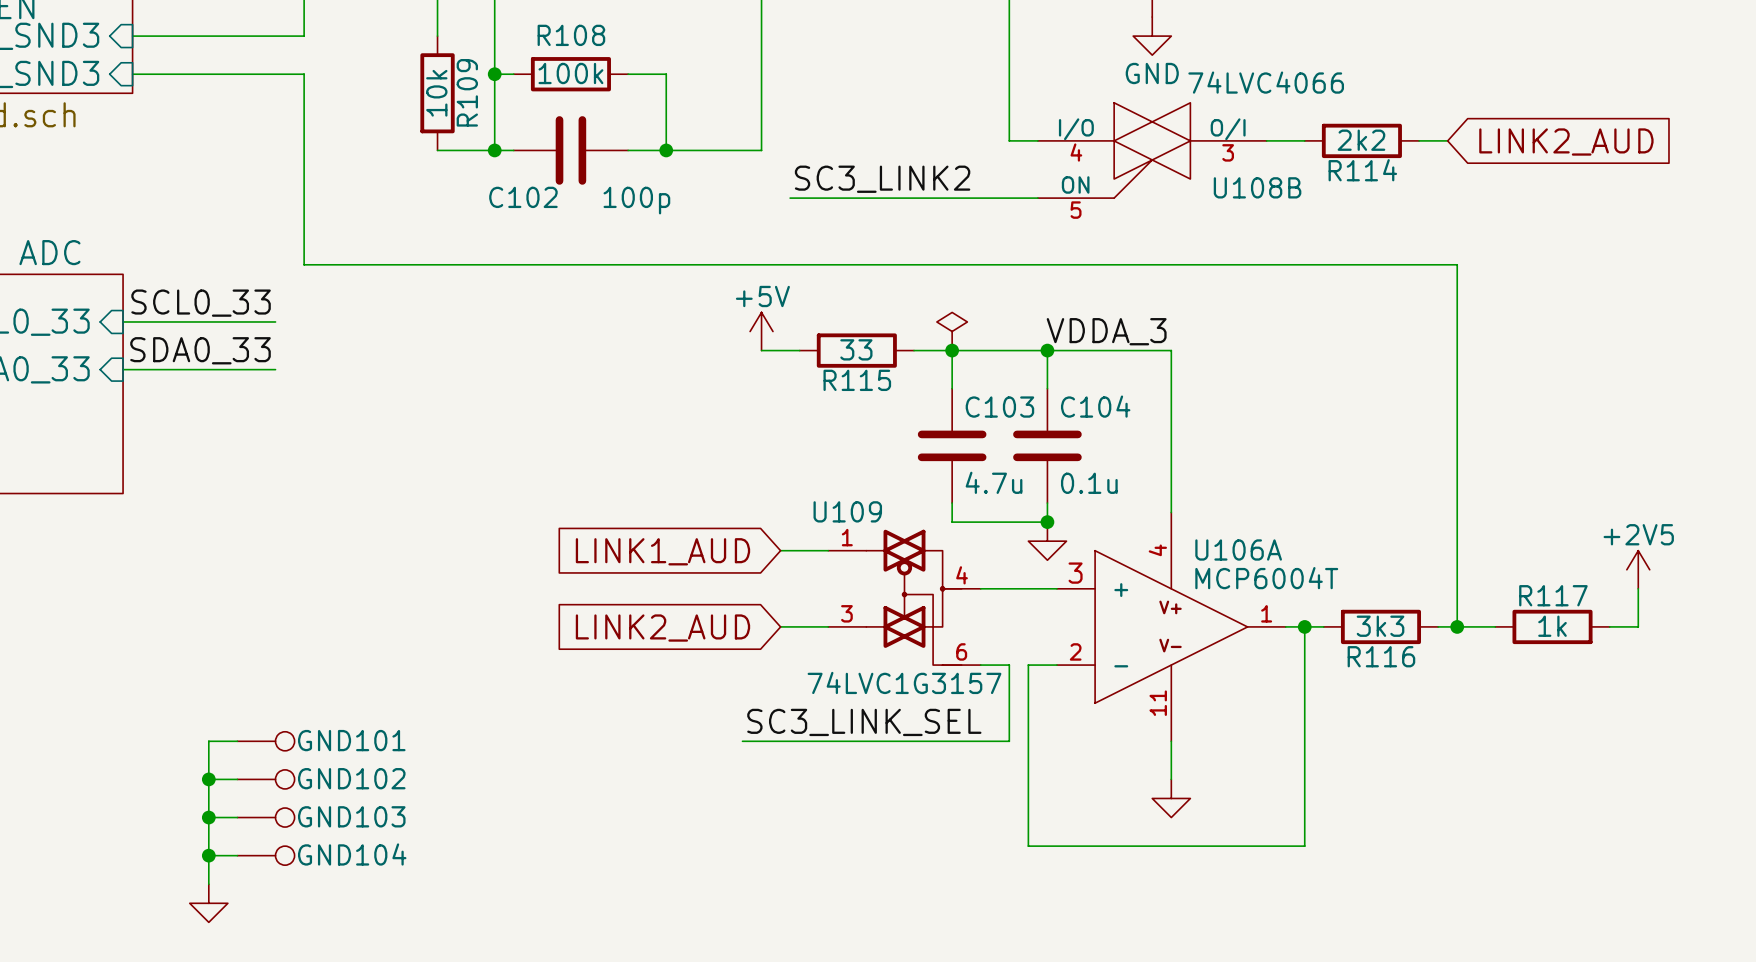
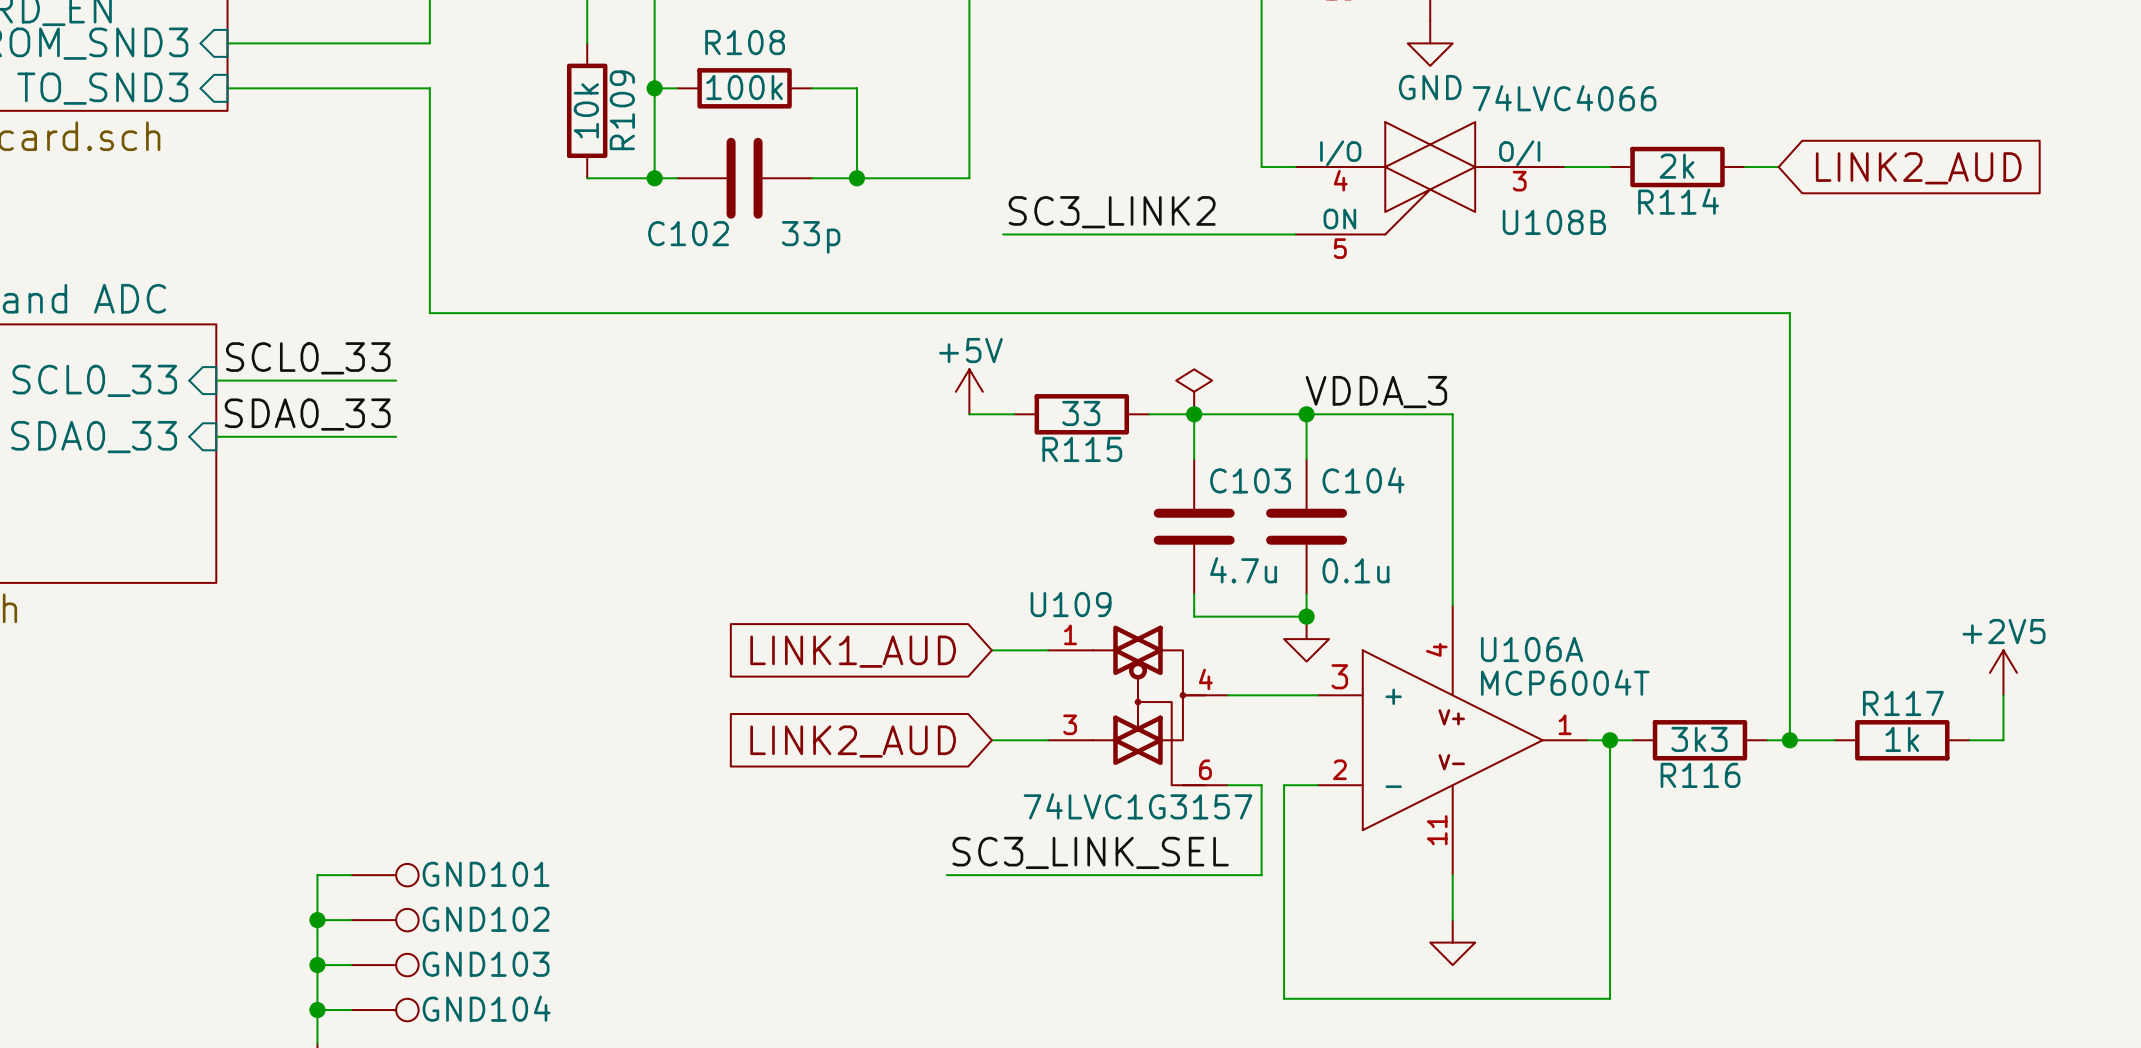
R114 value: 2k2 (1361, 140) -> 2k (1676, 166)
C102 value: 100p (636, 200) -> 33p (811, 237)

